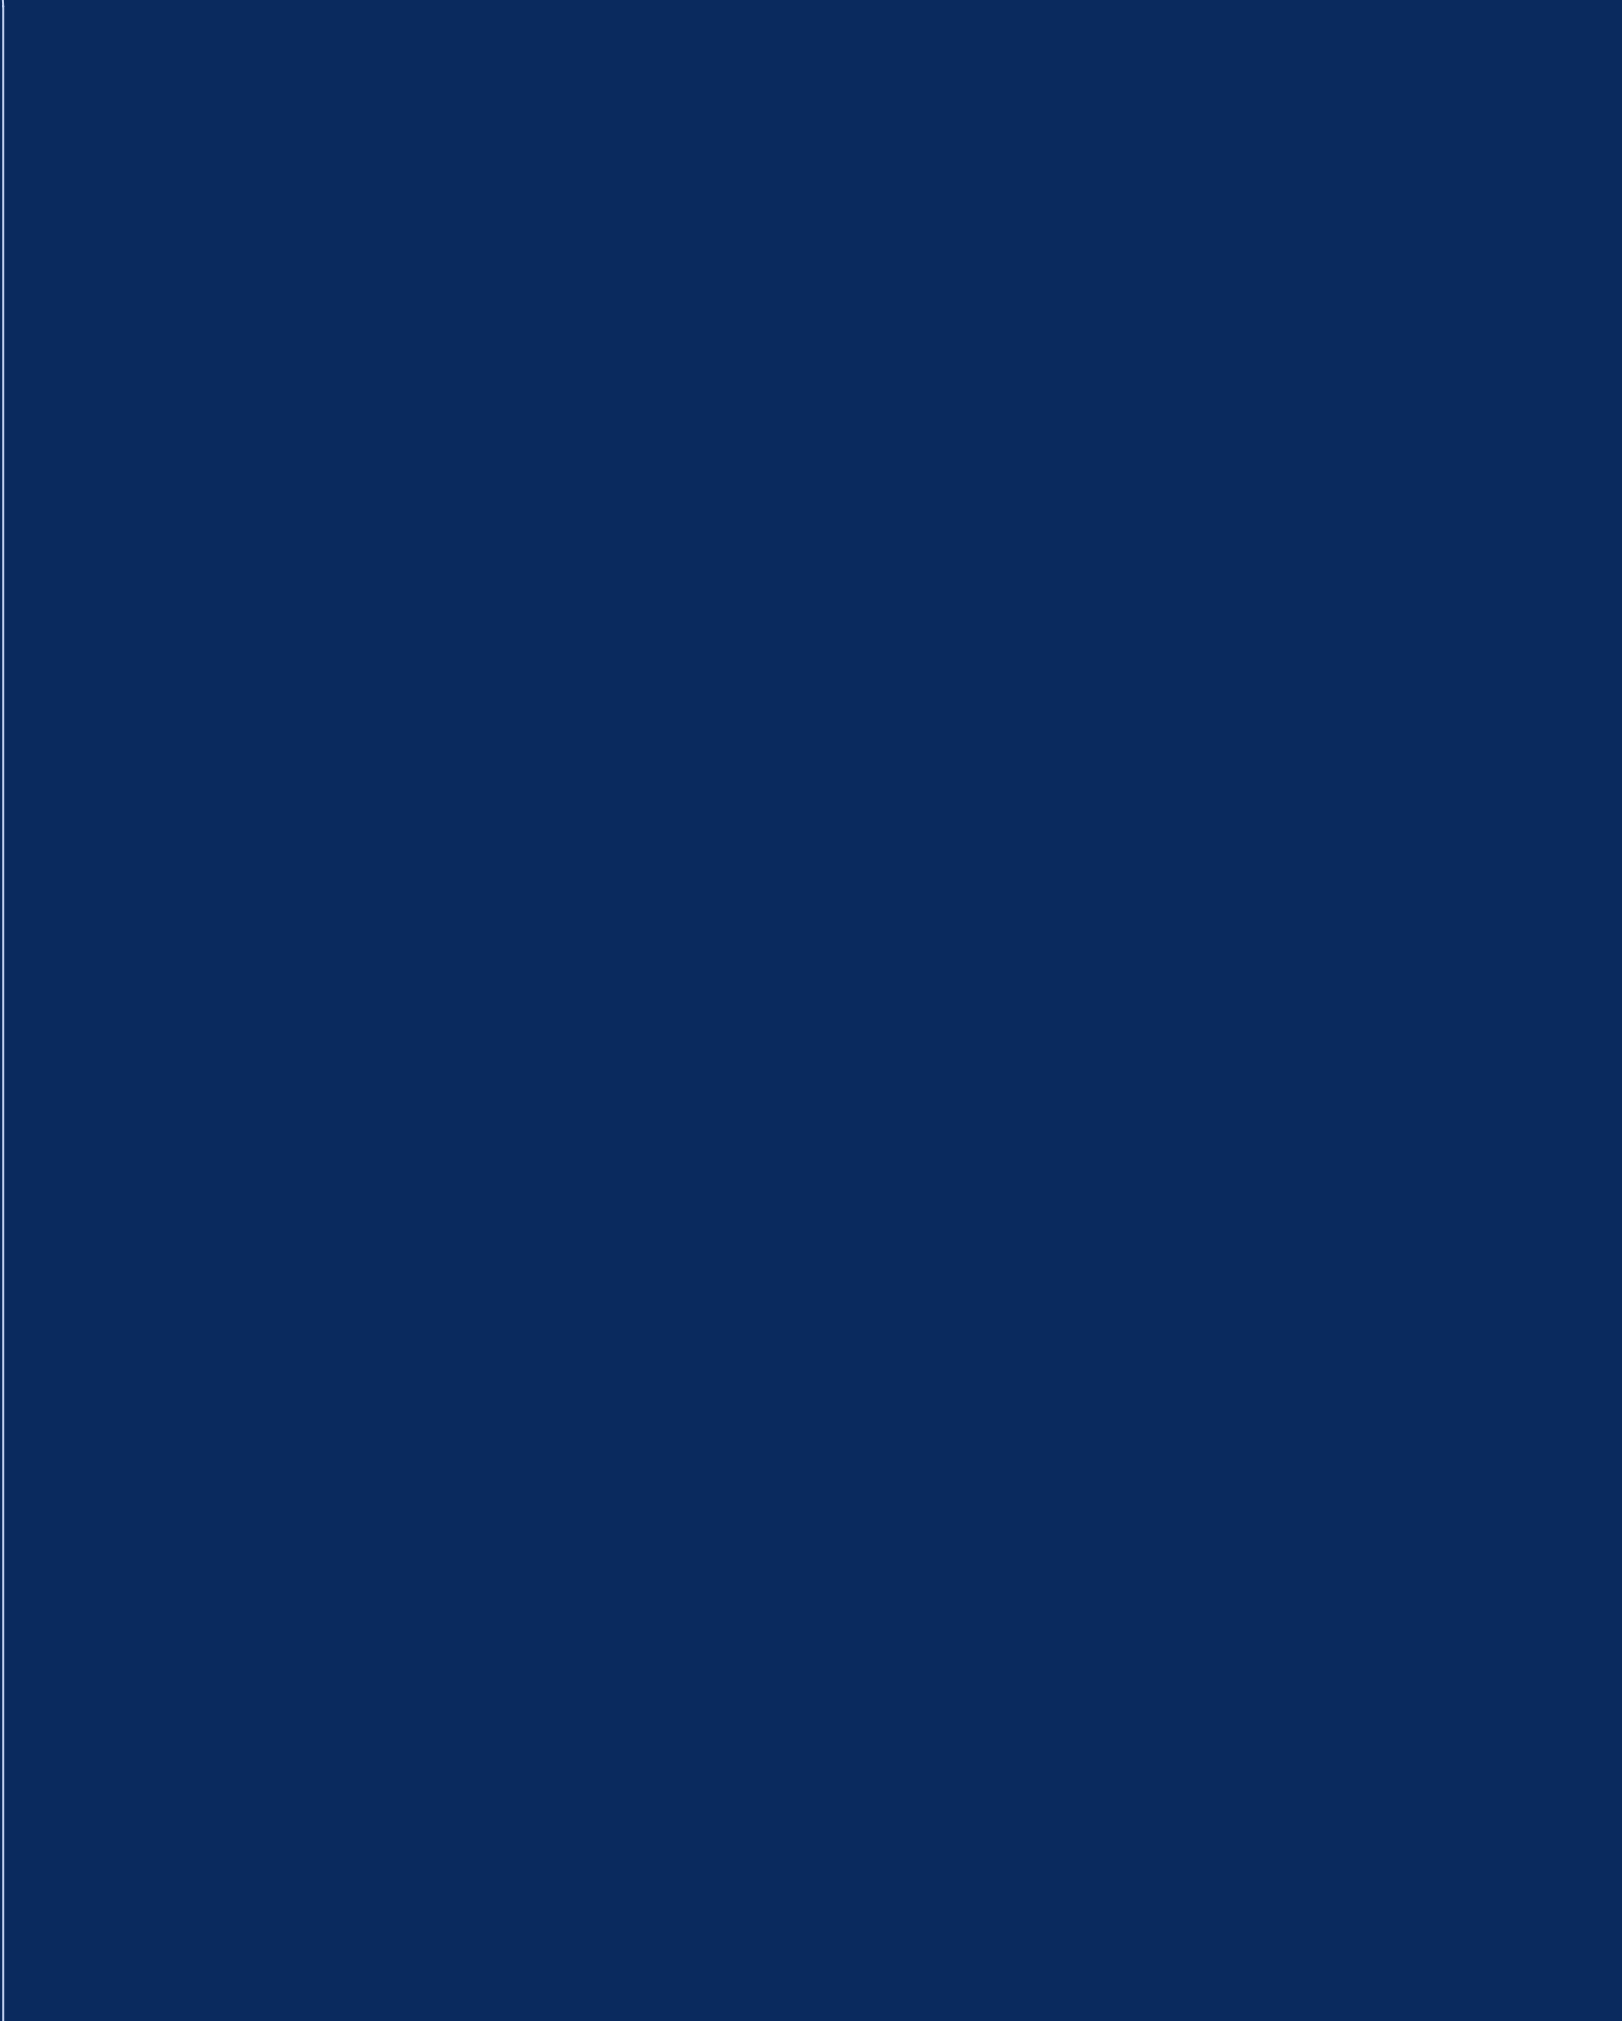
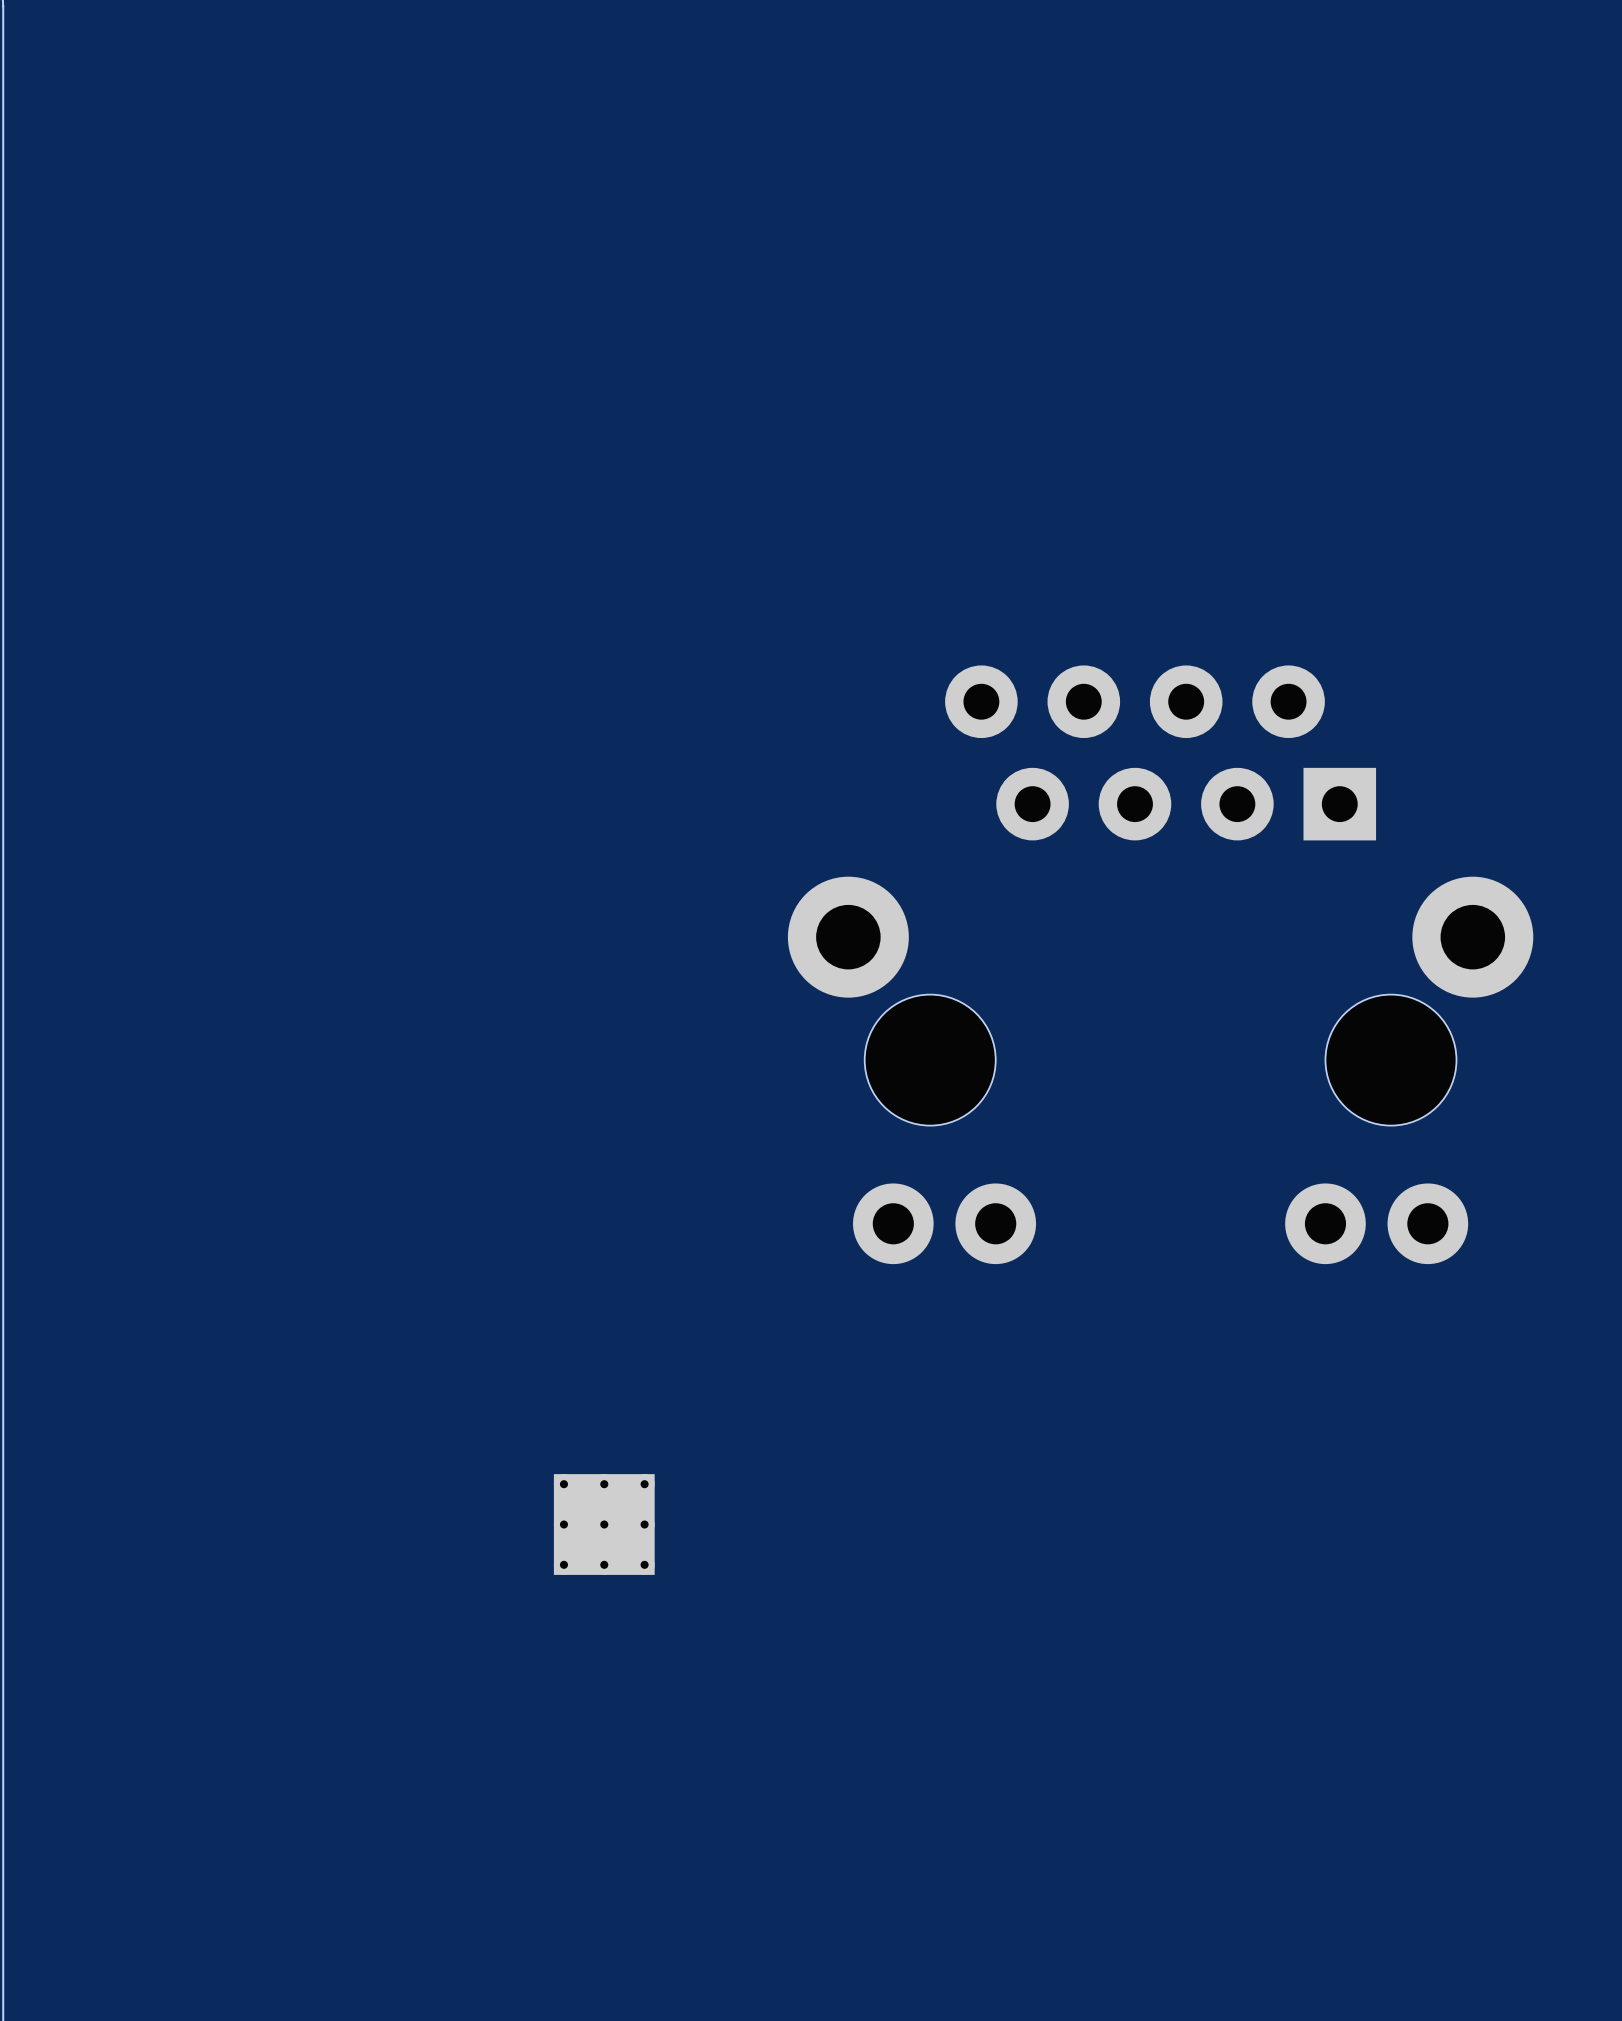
part: none -> (1160, 964)
part: none -> (604, 1524)

